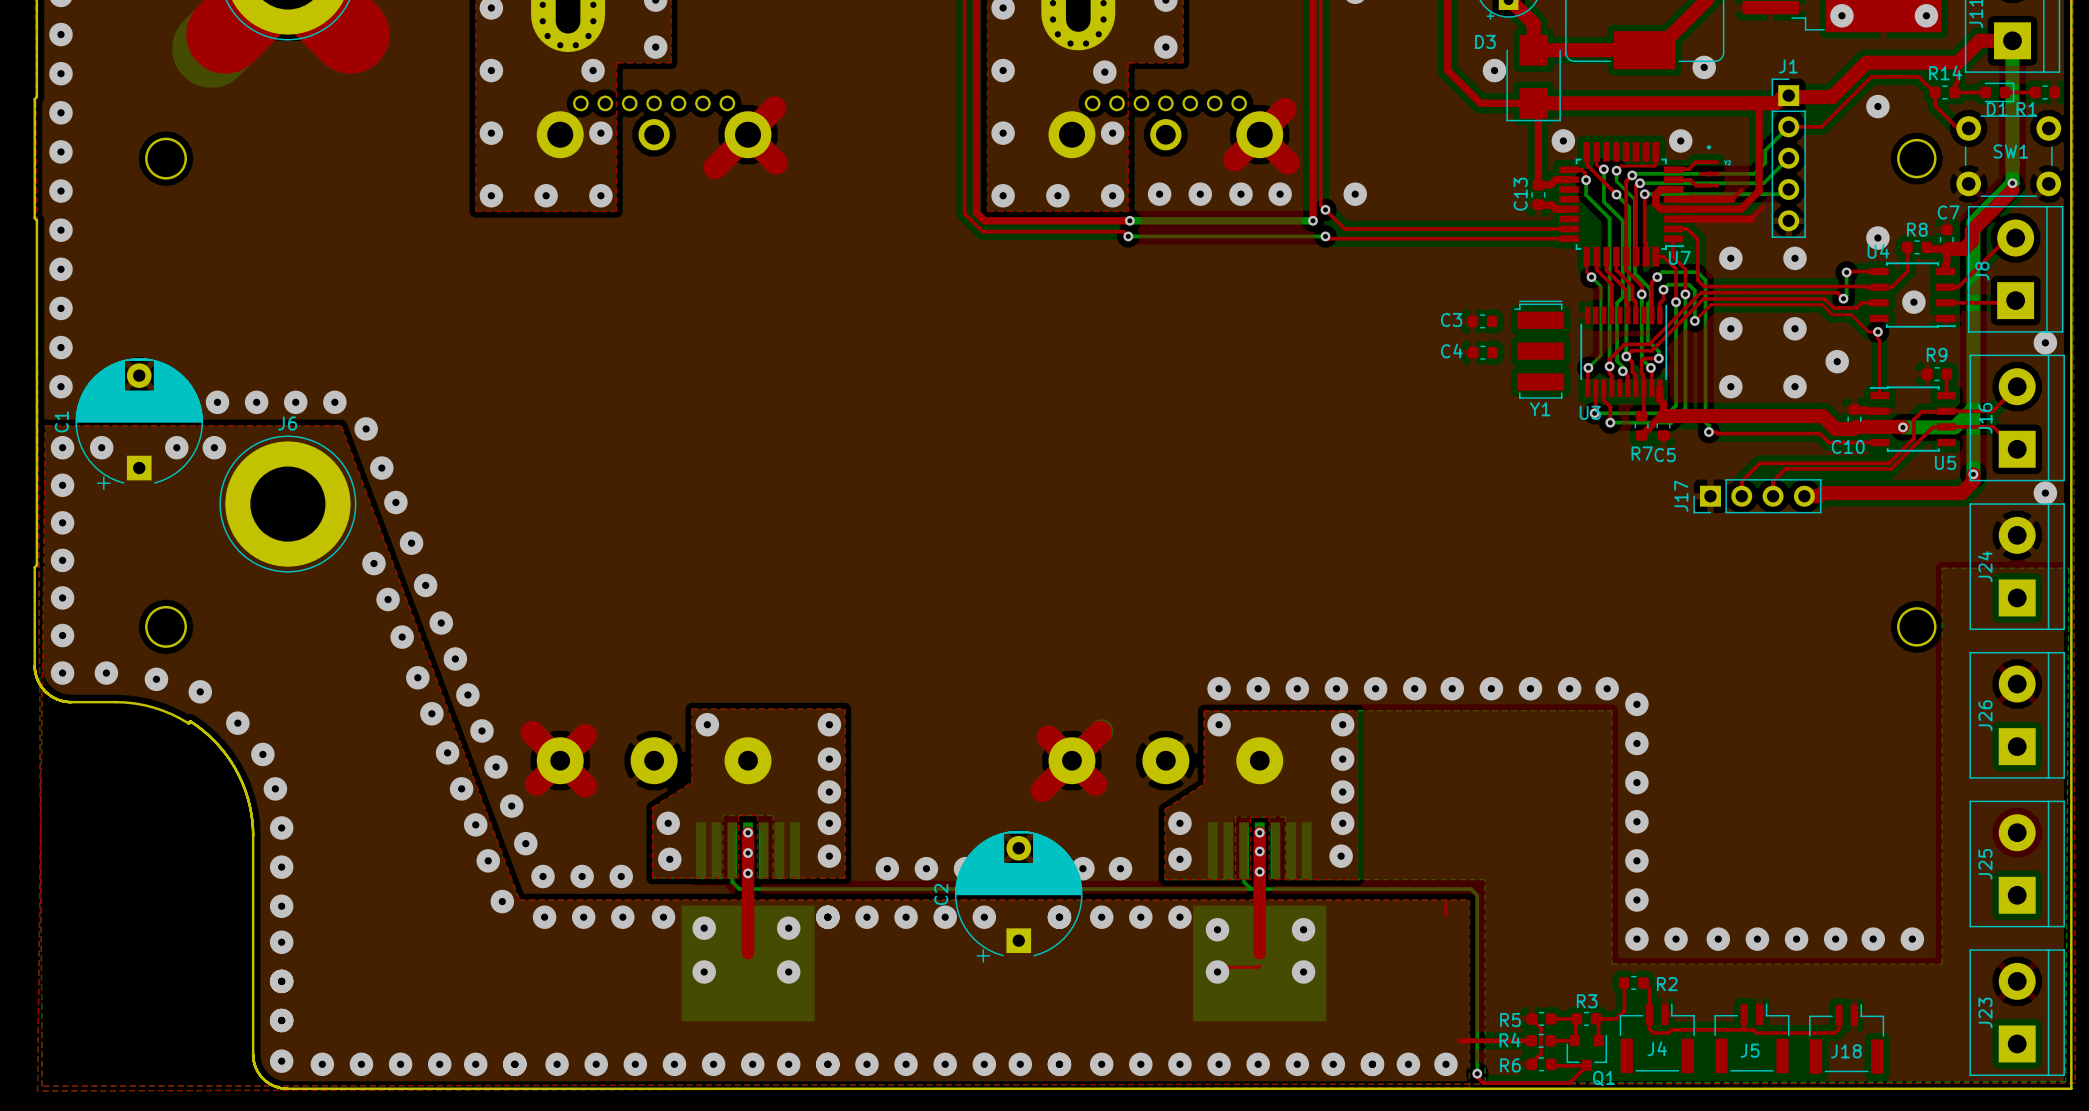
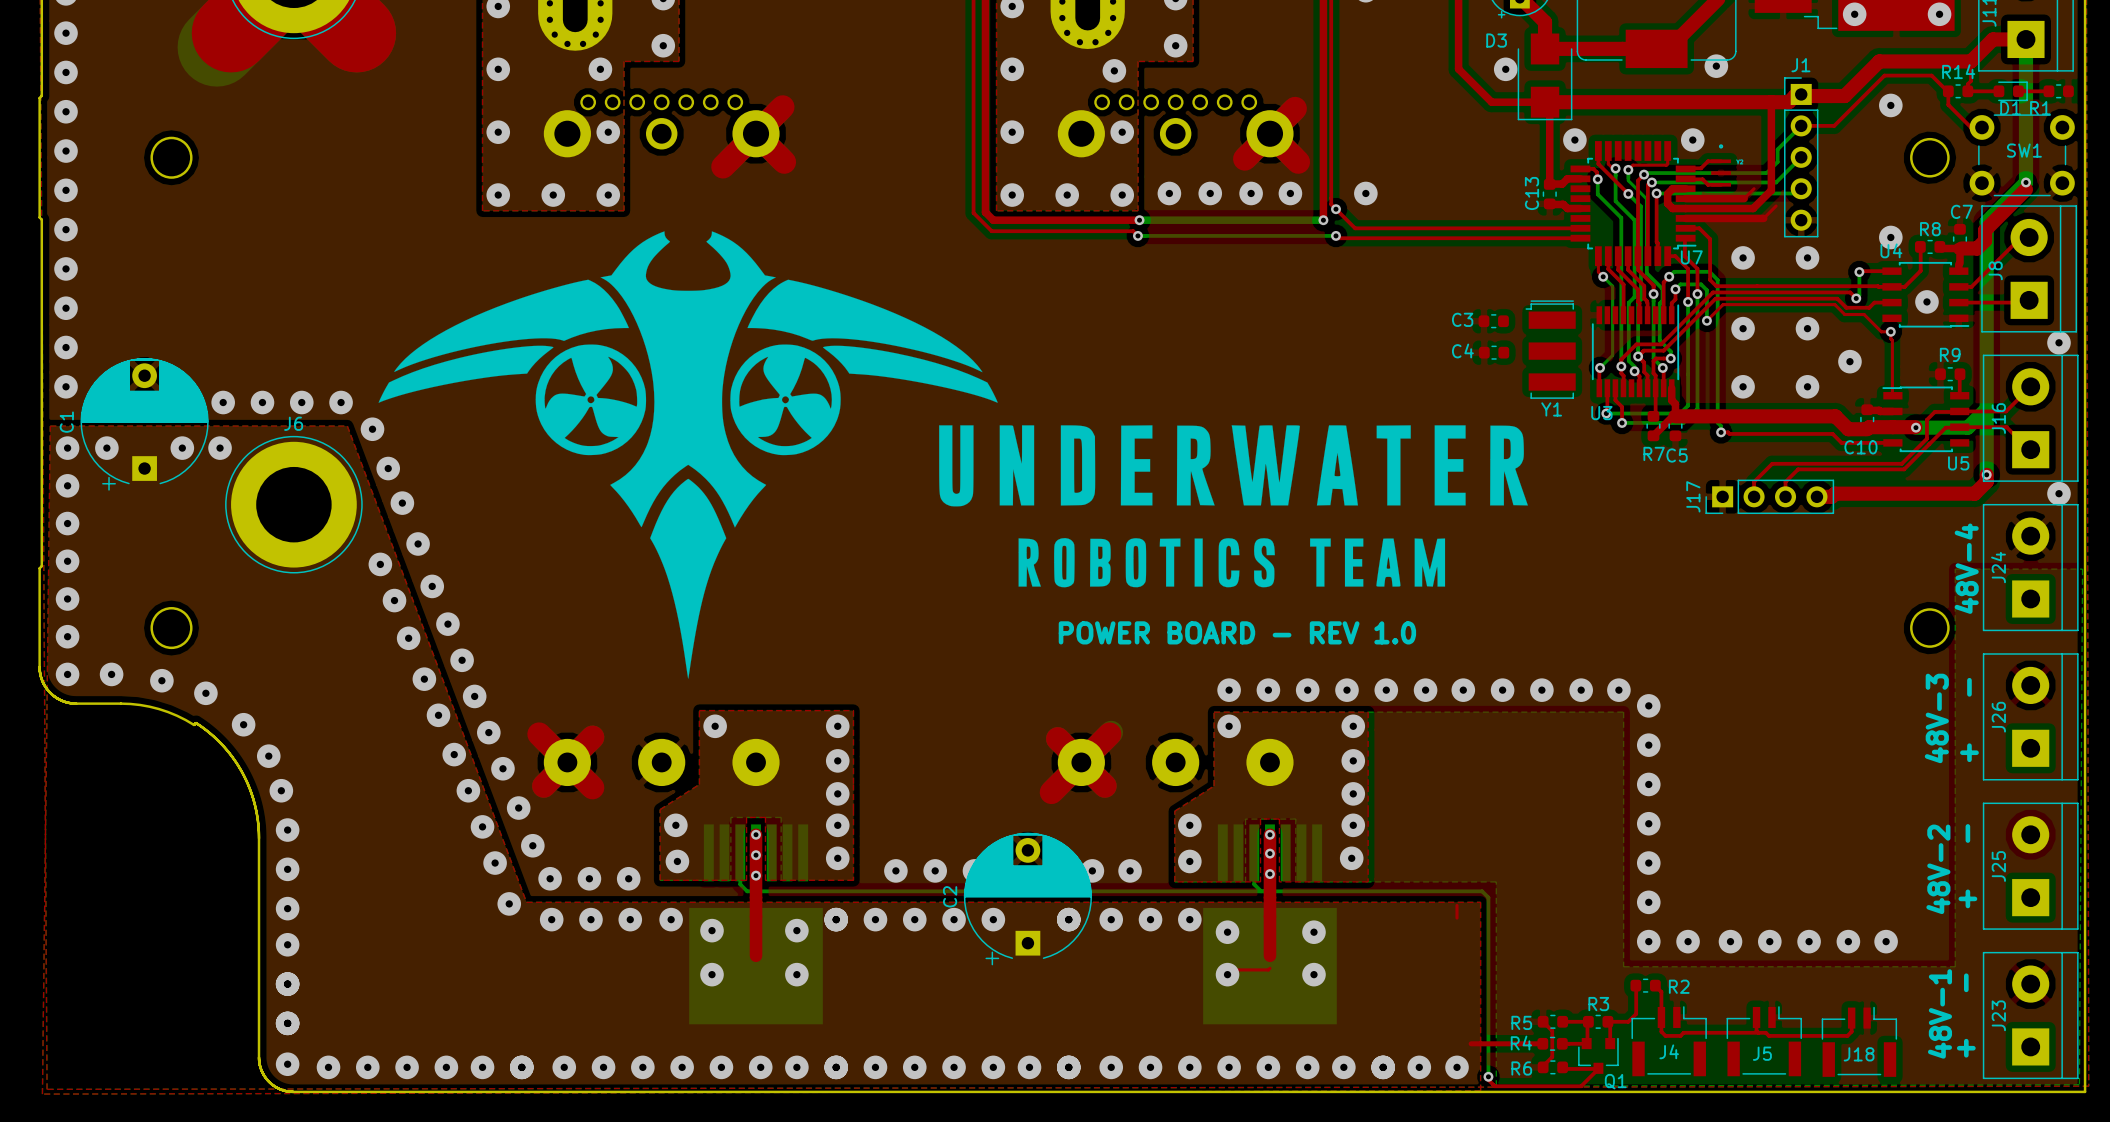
drawing: none -> [378, 231, 1528, 679]
text: none -> 48V-4 (1966, 568)
text: none -> POWER BOARD - REV 1.0 (1237, 632)
text: none -> 48V-3 (1936, 718)
text: none -> - + (1969, 720)
text: none -> - + (1967, 866)
text: none -> 48V-2 (1938, 869)
via: (1912, 939) -> none
text: none -> 48V-1 (1939, 1013)
text: none -> - + (1966, 1015)

